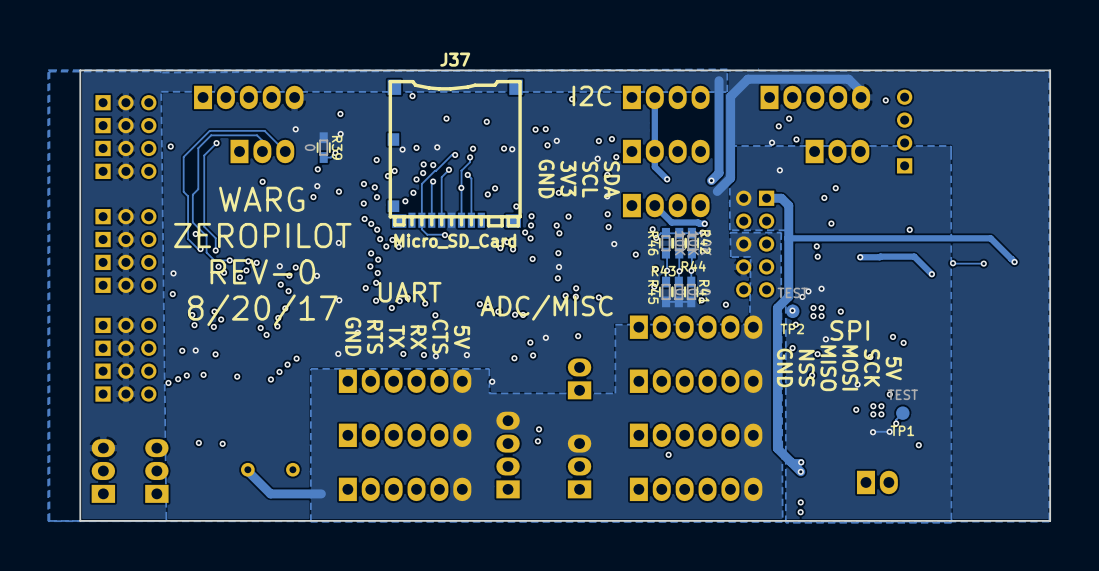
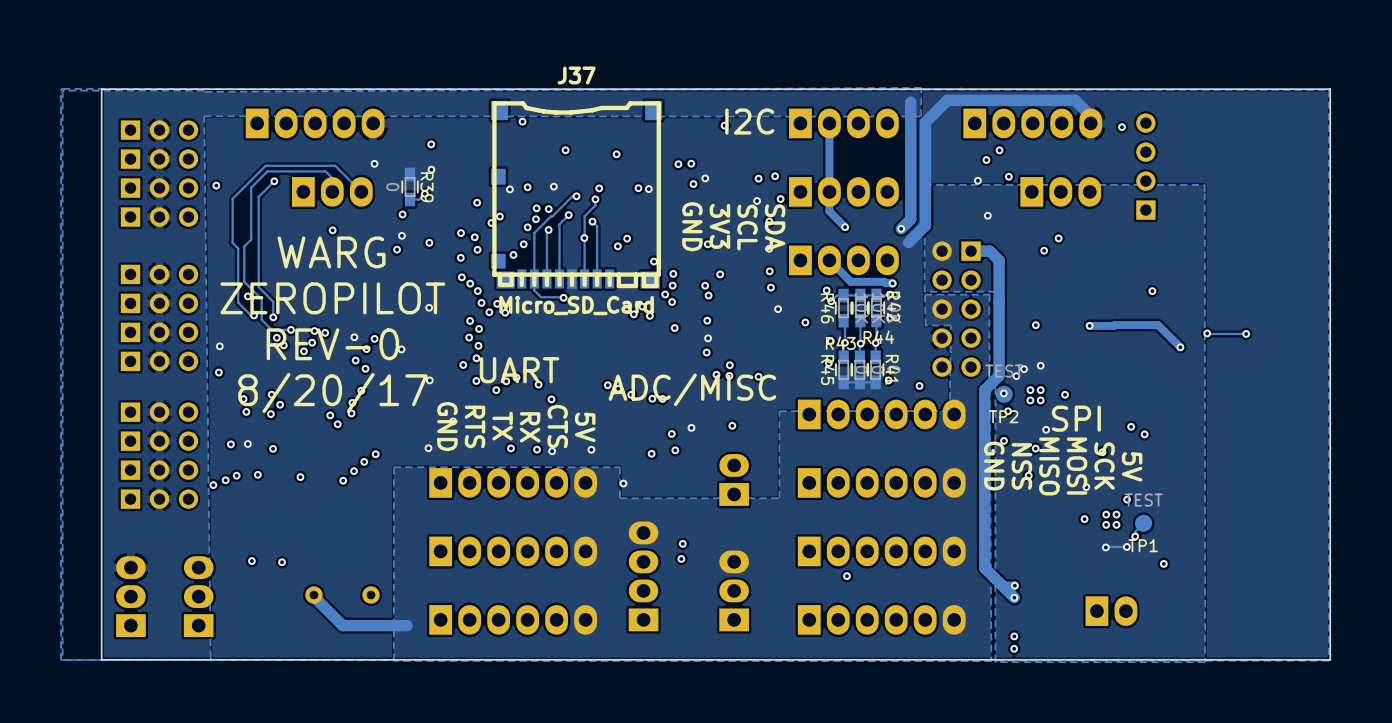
via: (831, 223) -> none
track: (788, 238) (990, 238) (1011, 258) -> none
via: (816, 246) -> none
via: (1014, 262) -> none

